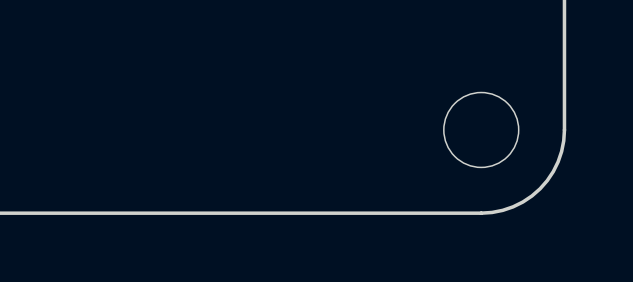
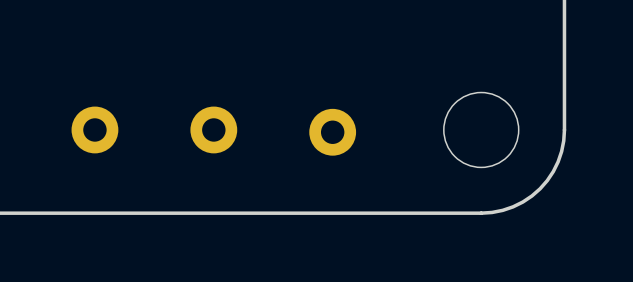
part: none -> (94, 129)
part: none -> (213, 129)
part: none -> (332, 132)

